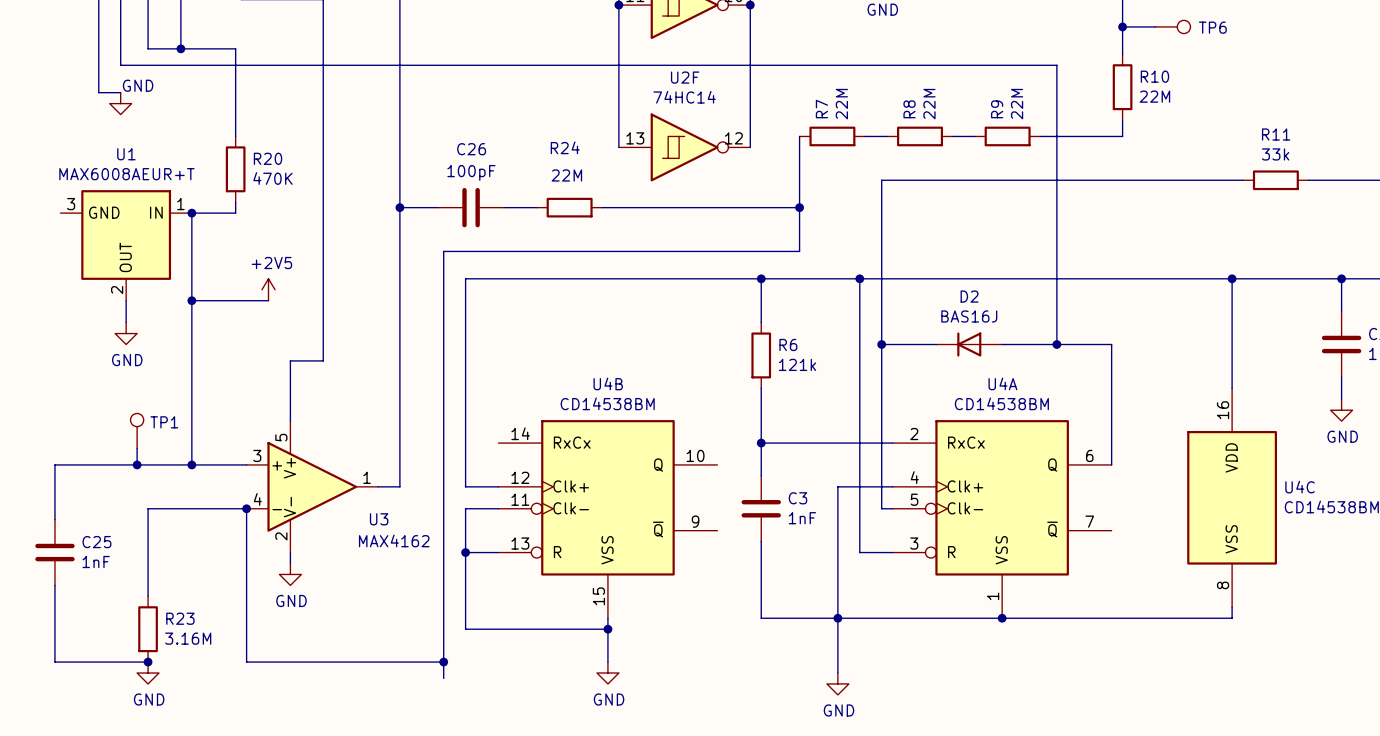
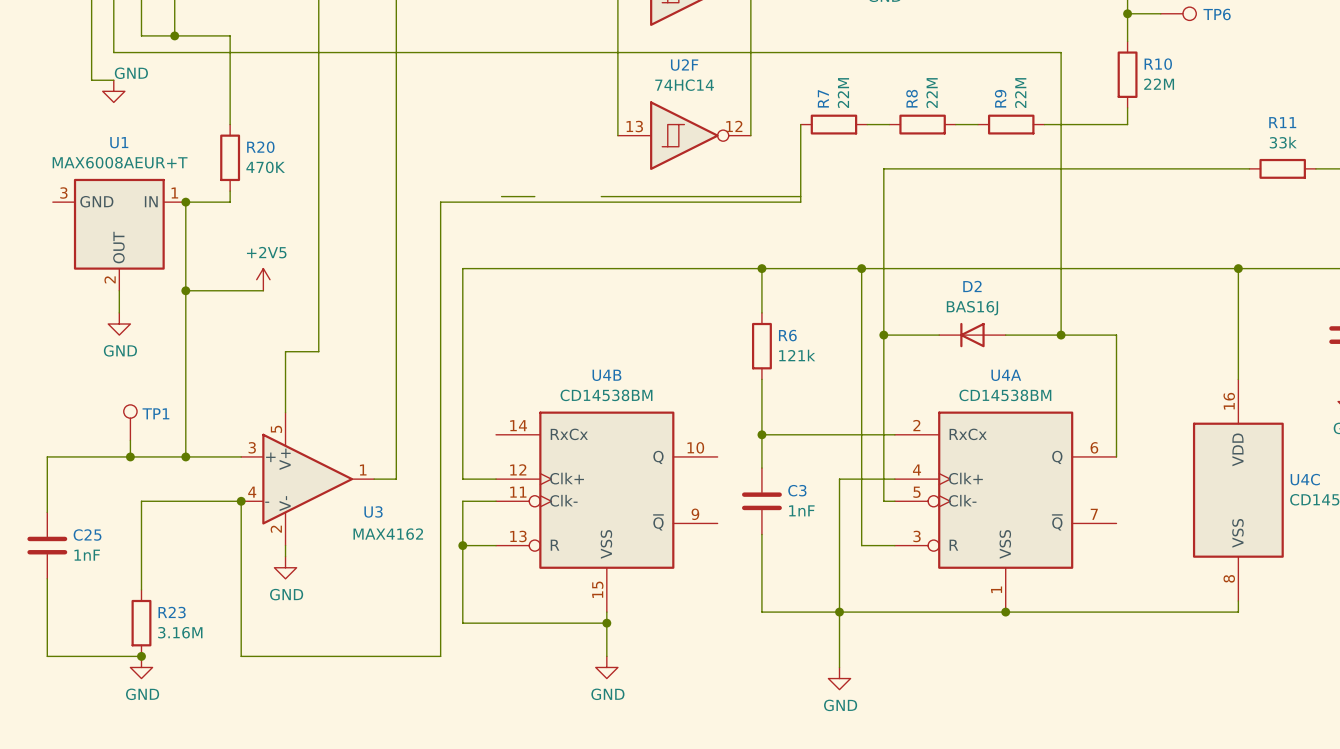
wire: (399, 207) (438, 207) -> none
junction: (399, 207) -> none
C26: 100pF (471, 207) -> none
R24: 22M (569, 207) -> none
junction: (799, 207) -> none
wire: (799, 213) (799, 251) (443, 251) -> (800, 202) (440, 202) (440, 240)
wire: (443, 662) (443, 678) -> none
junction: (443, 662) -> none

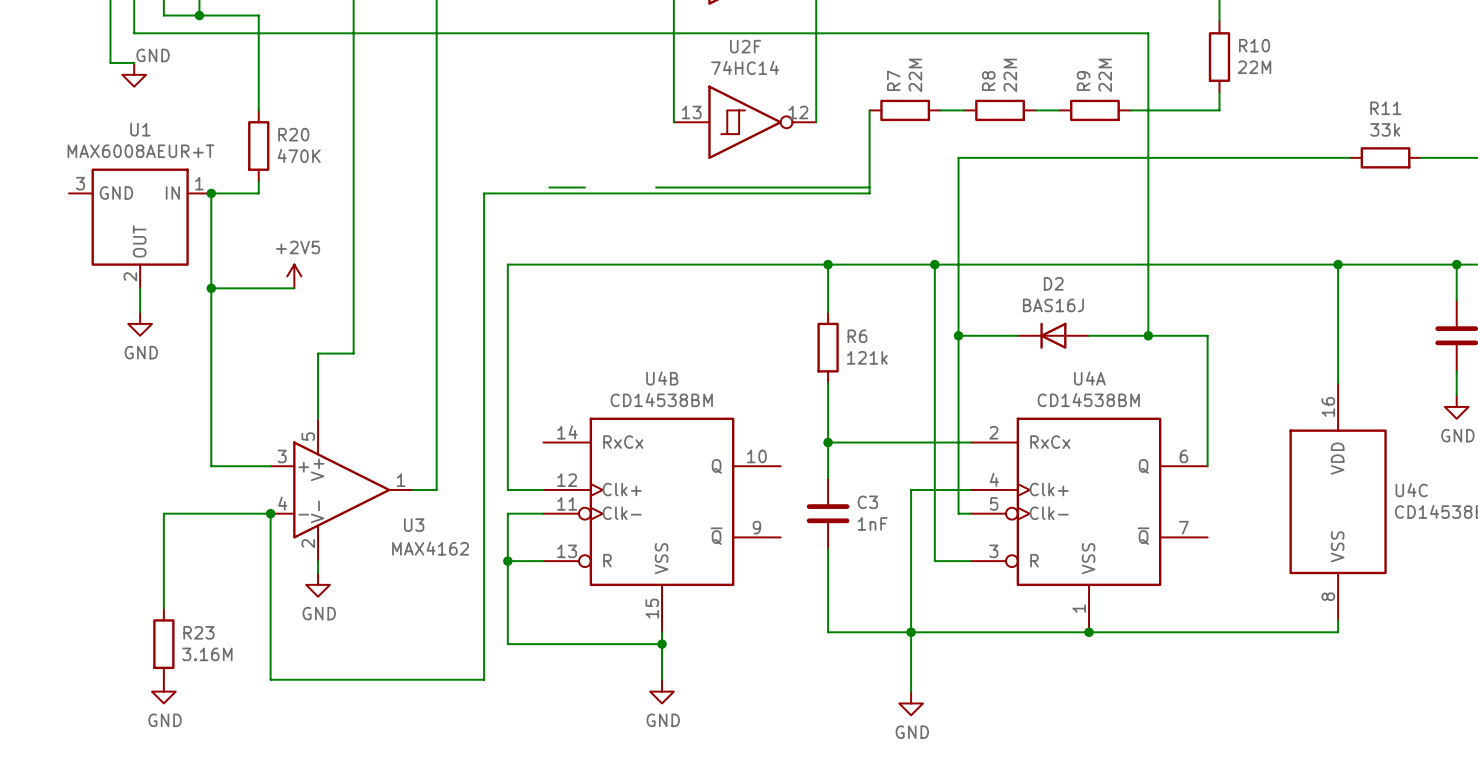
TP1: (130, 422) -> none
wire: (130, 440) (130, 456) -> none
junction: (130, 456) -> none
wire: (185, 456) (47, 456) (47, 512) -> none
junction: (185, 456) -> none
C25: 1nF (47, 545) -> none
wire: (47, 578) (47, 656) (141, 656) -> none
junction: (141, 656) -> none

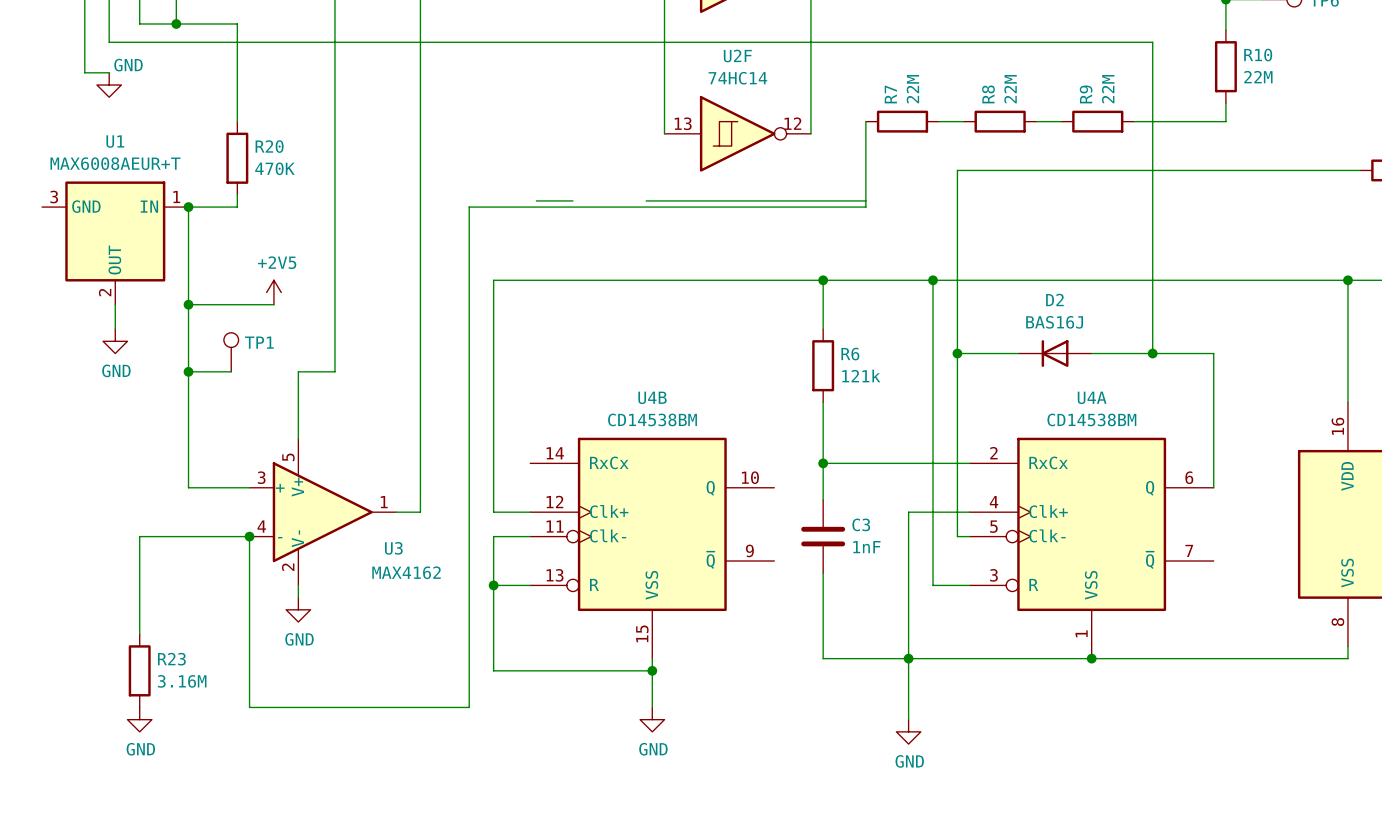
TP1: none -> (231, 352)
wire: none -> (188, 371) (231, 371)
junction: none -> (188, 371)

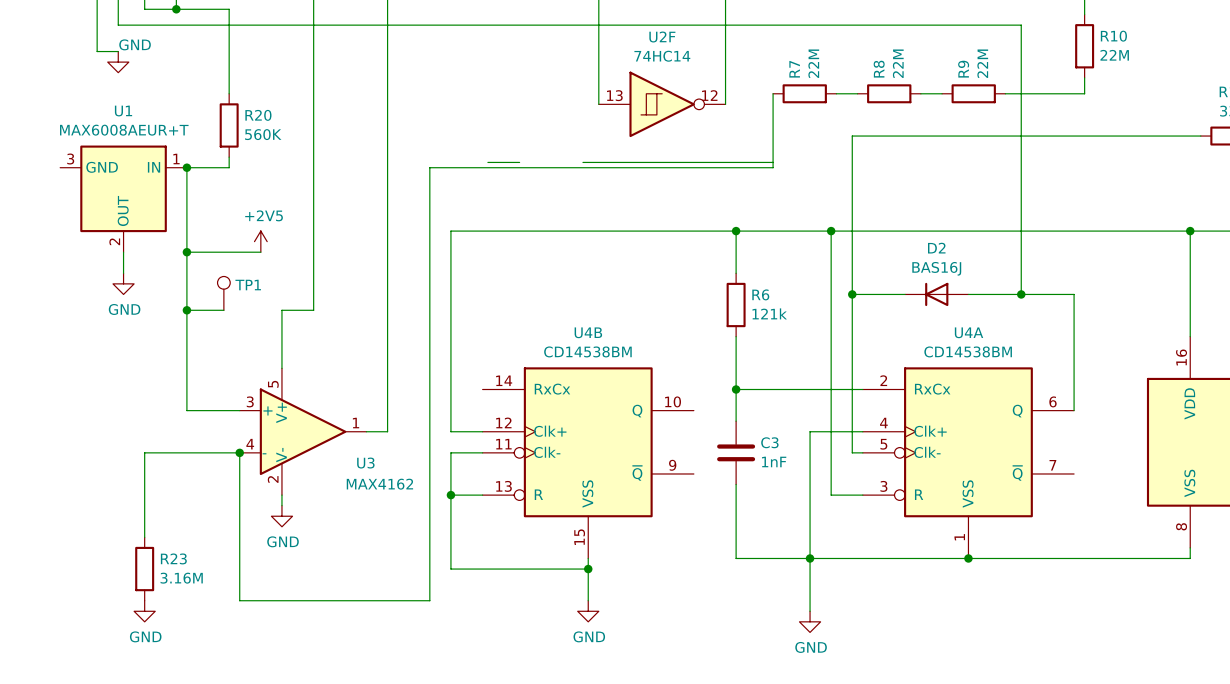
R20 value: 470K (274, 168) -> 560K (263, 134)

